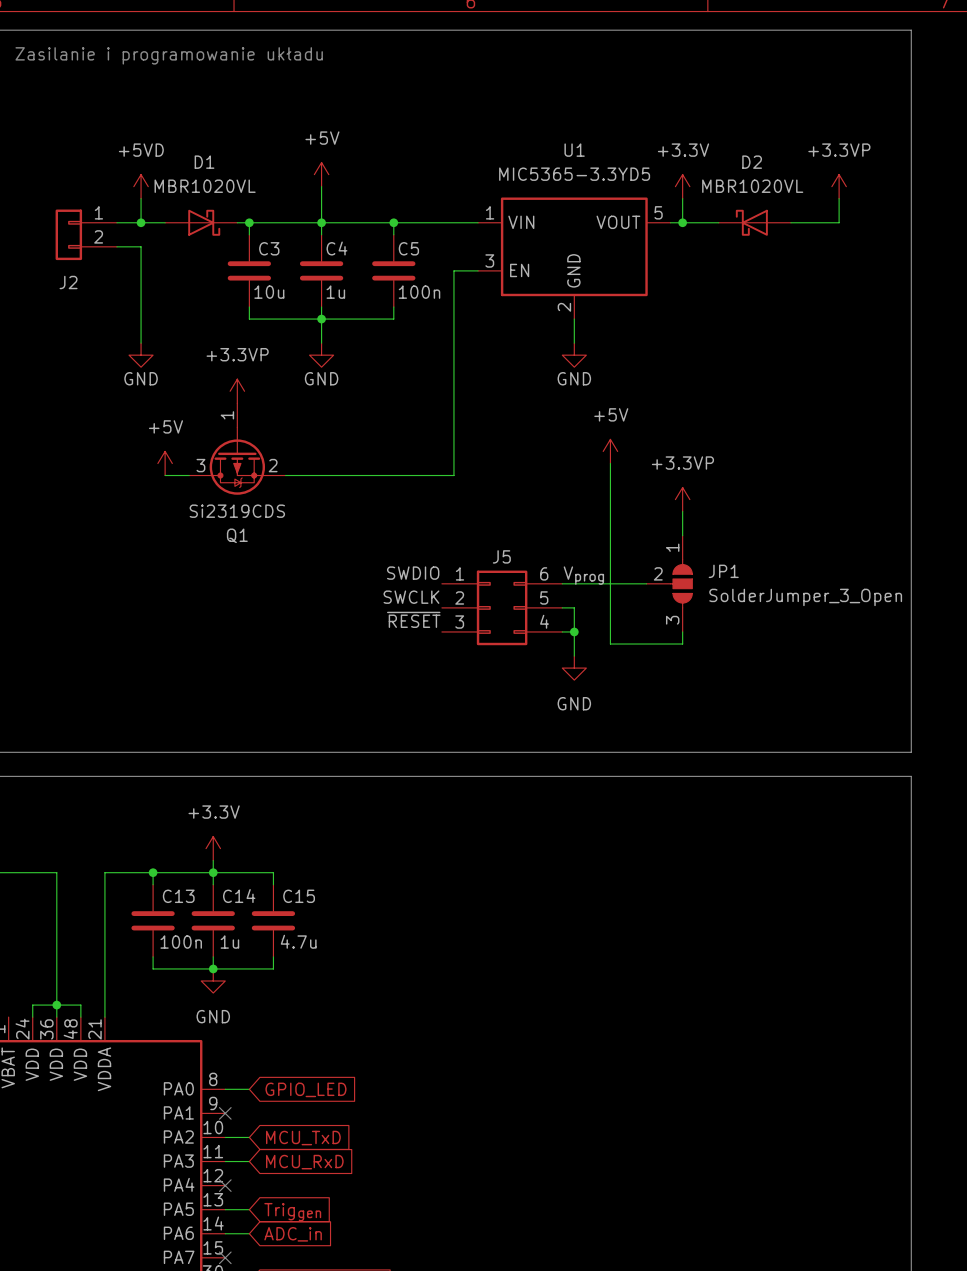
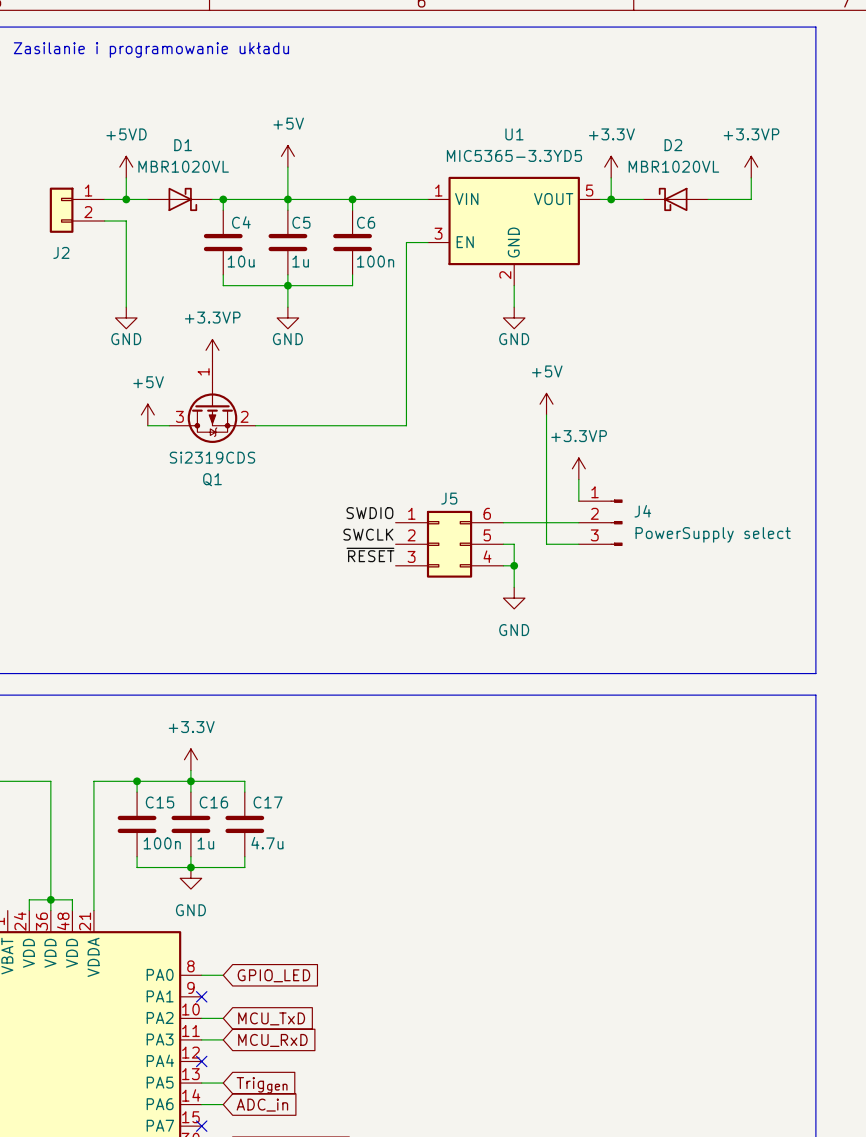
C3 name: C3 (269, 248) -> C4 (241, 222)
C4 name: C4 (336, 248) -> C5 (301, 222)
C5 name: C5 (408, 248) -> C6 (366, 222)
power symbol position: +3.3VP (682, 499) -> +3.3VP (578, 468)
wire: (682, 511) (682, 535) -> (578, 479) (578, 501)
label: Vprog (583, 575) -> none
JP1: SolderJumper_3_Open (669, 583) -> none
J4: none -> PowerSupply select (600, 522)
wire: (610, 607) (610, 644) (682, 644) (682, 631) -> (546, 544) (578, 544)
C13 name: C13 (178, 896) -> C15 (160, 802)
C14 name: C14 (239, 896) -> C16 (213, 802)
C15 name: C15 (299, 896) -> C17 (268, 802)

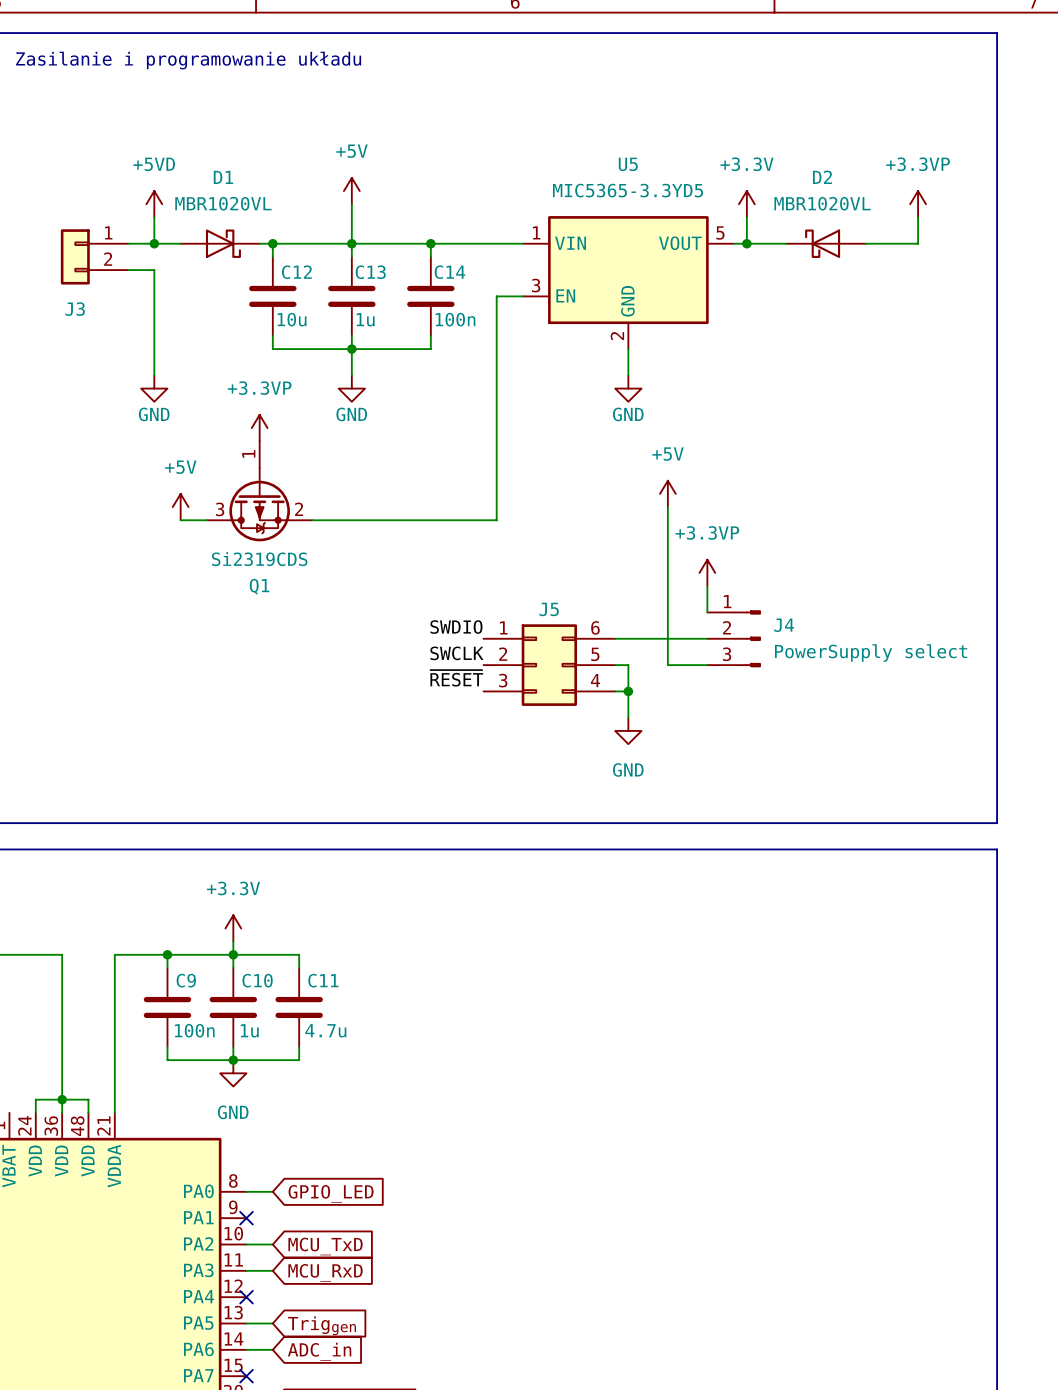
U1 name: U1 (514, 134) -> U5 (628, 164)
C4 name: C4 (241, 222) -> C12 (296, 272)
C5 name: C5 (301, 222) -> C13 (370, 272)
C6 name: C6 (366, 222) -> C14 (449, 272)
J2 name: J2 (61, 252) -> J3 (75, 309)
C15 name: C15 (160, 802) -> C9 (186, 980)
C16 name: C16 (213, 802) -> C10 (257, 980)
C17 name: C17 (268, 802) -> C11 (323, 980)

